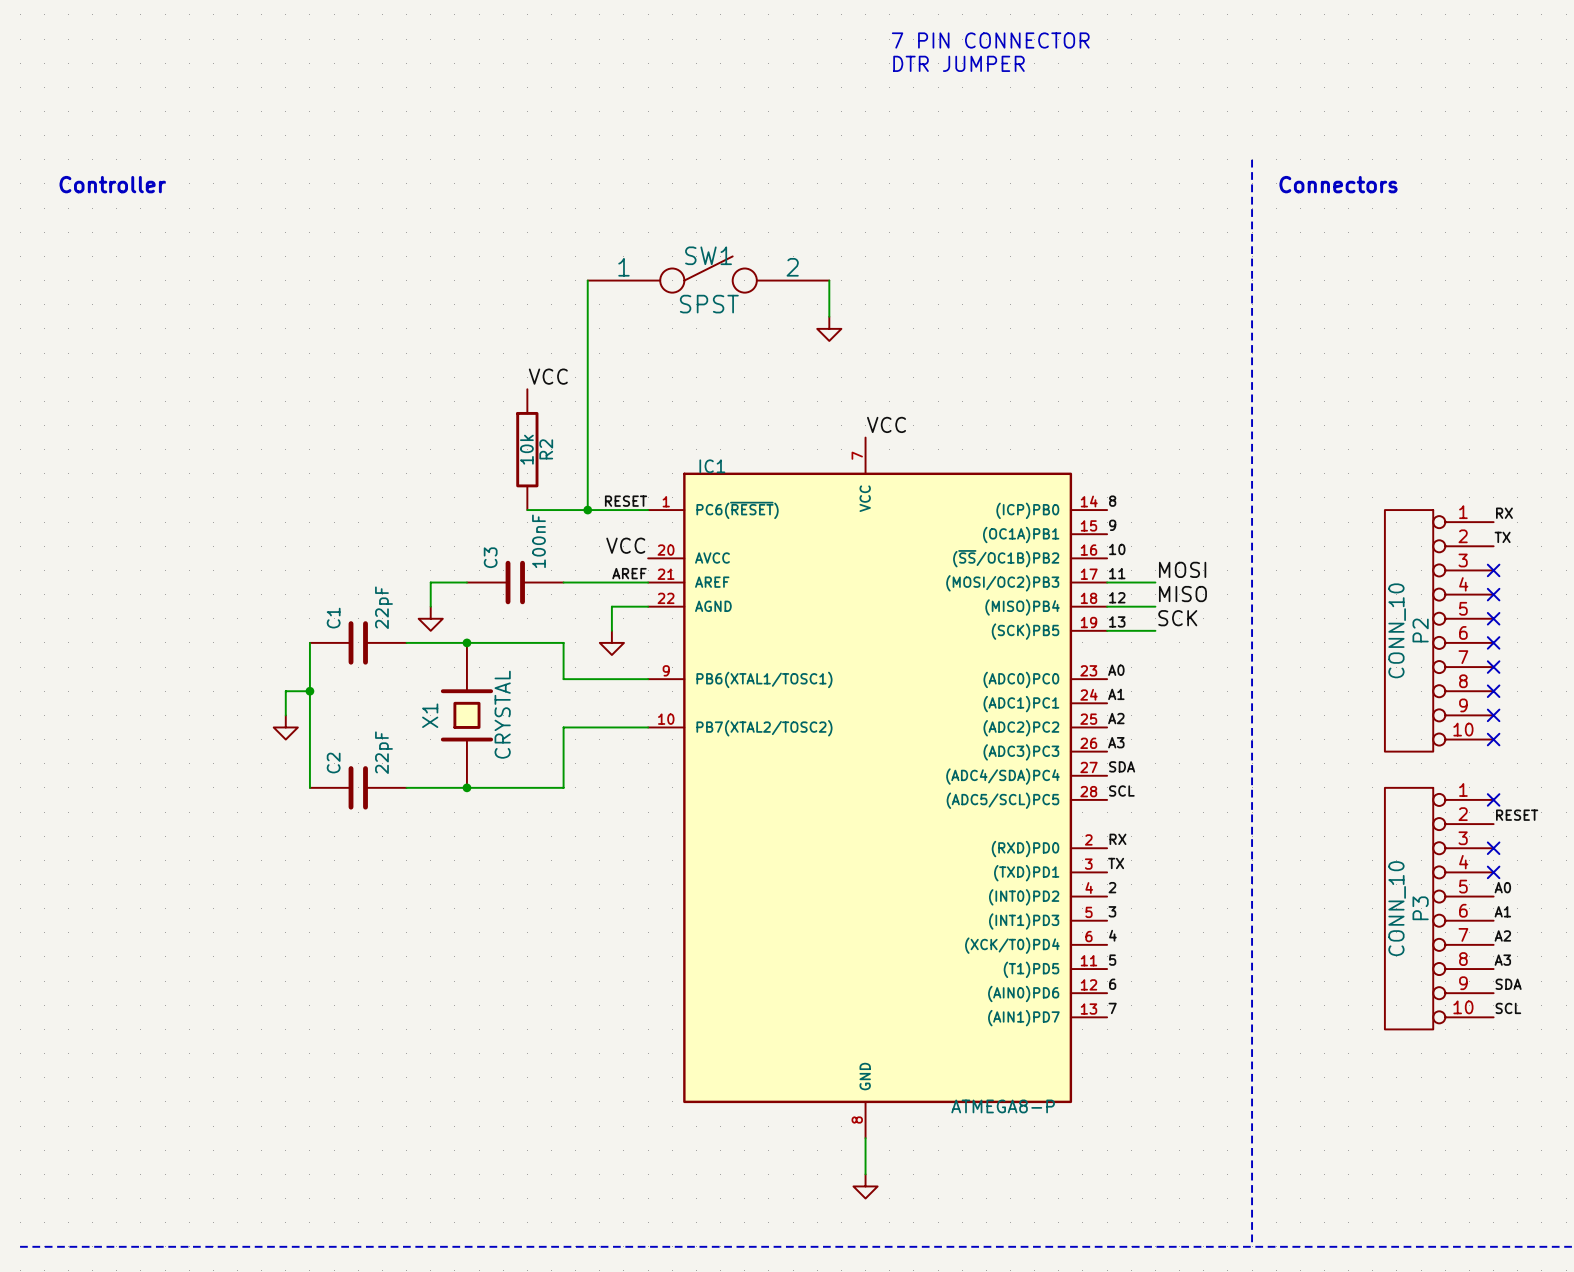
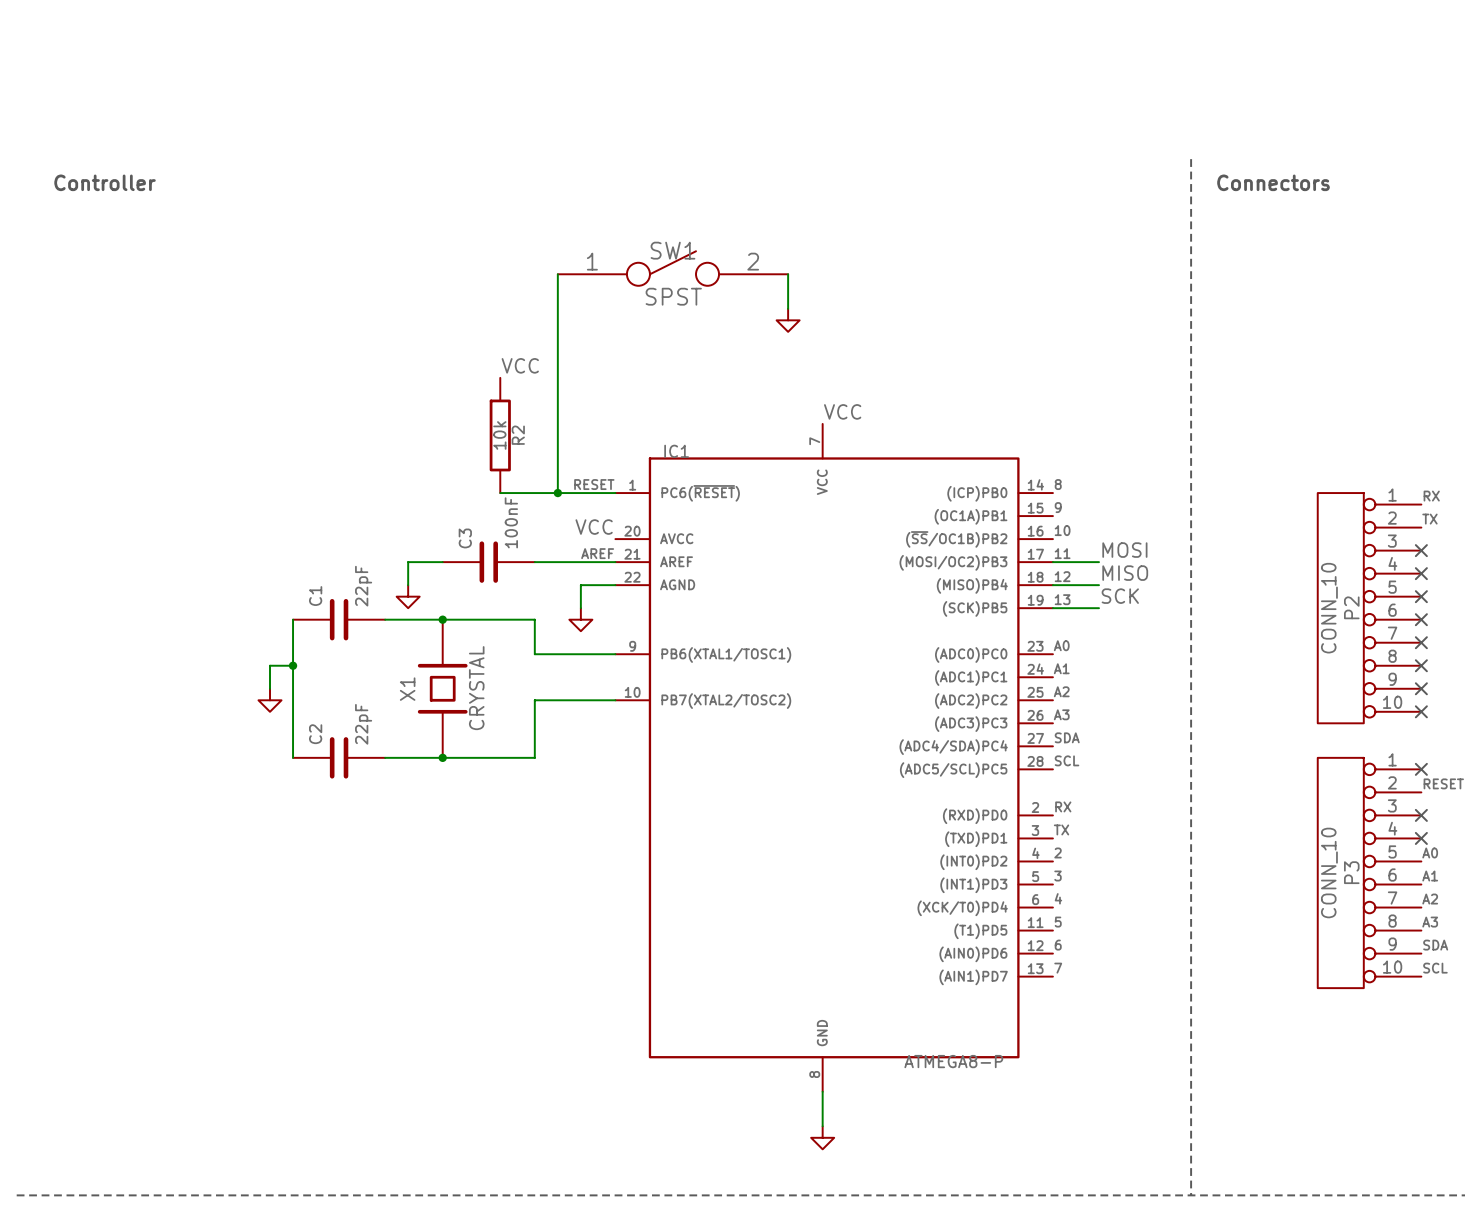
text: 7 PIN CONNECTOR (990, 40) -> none
text: DTR JUMPER (958, 63) -> none

